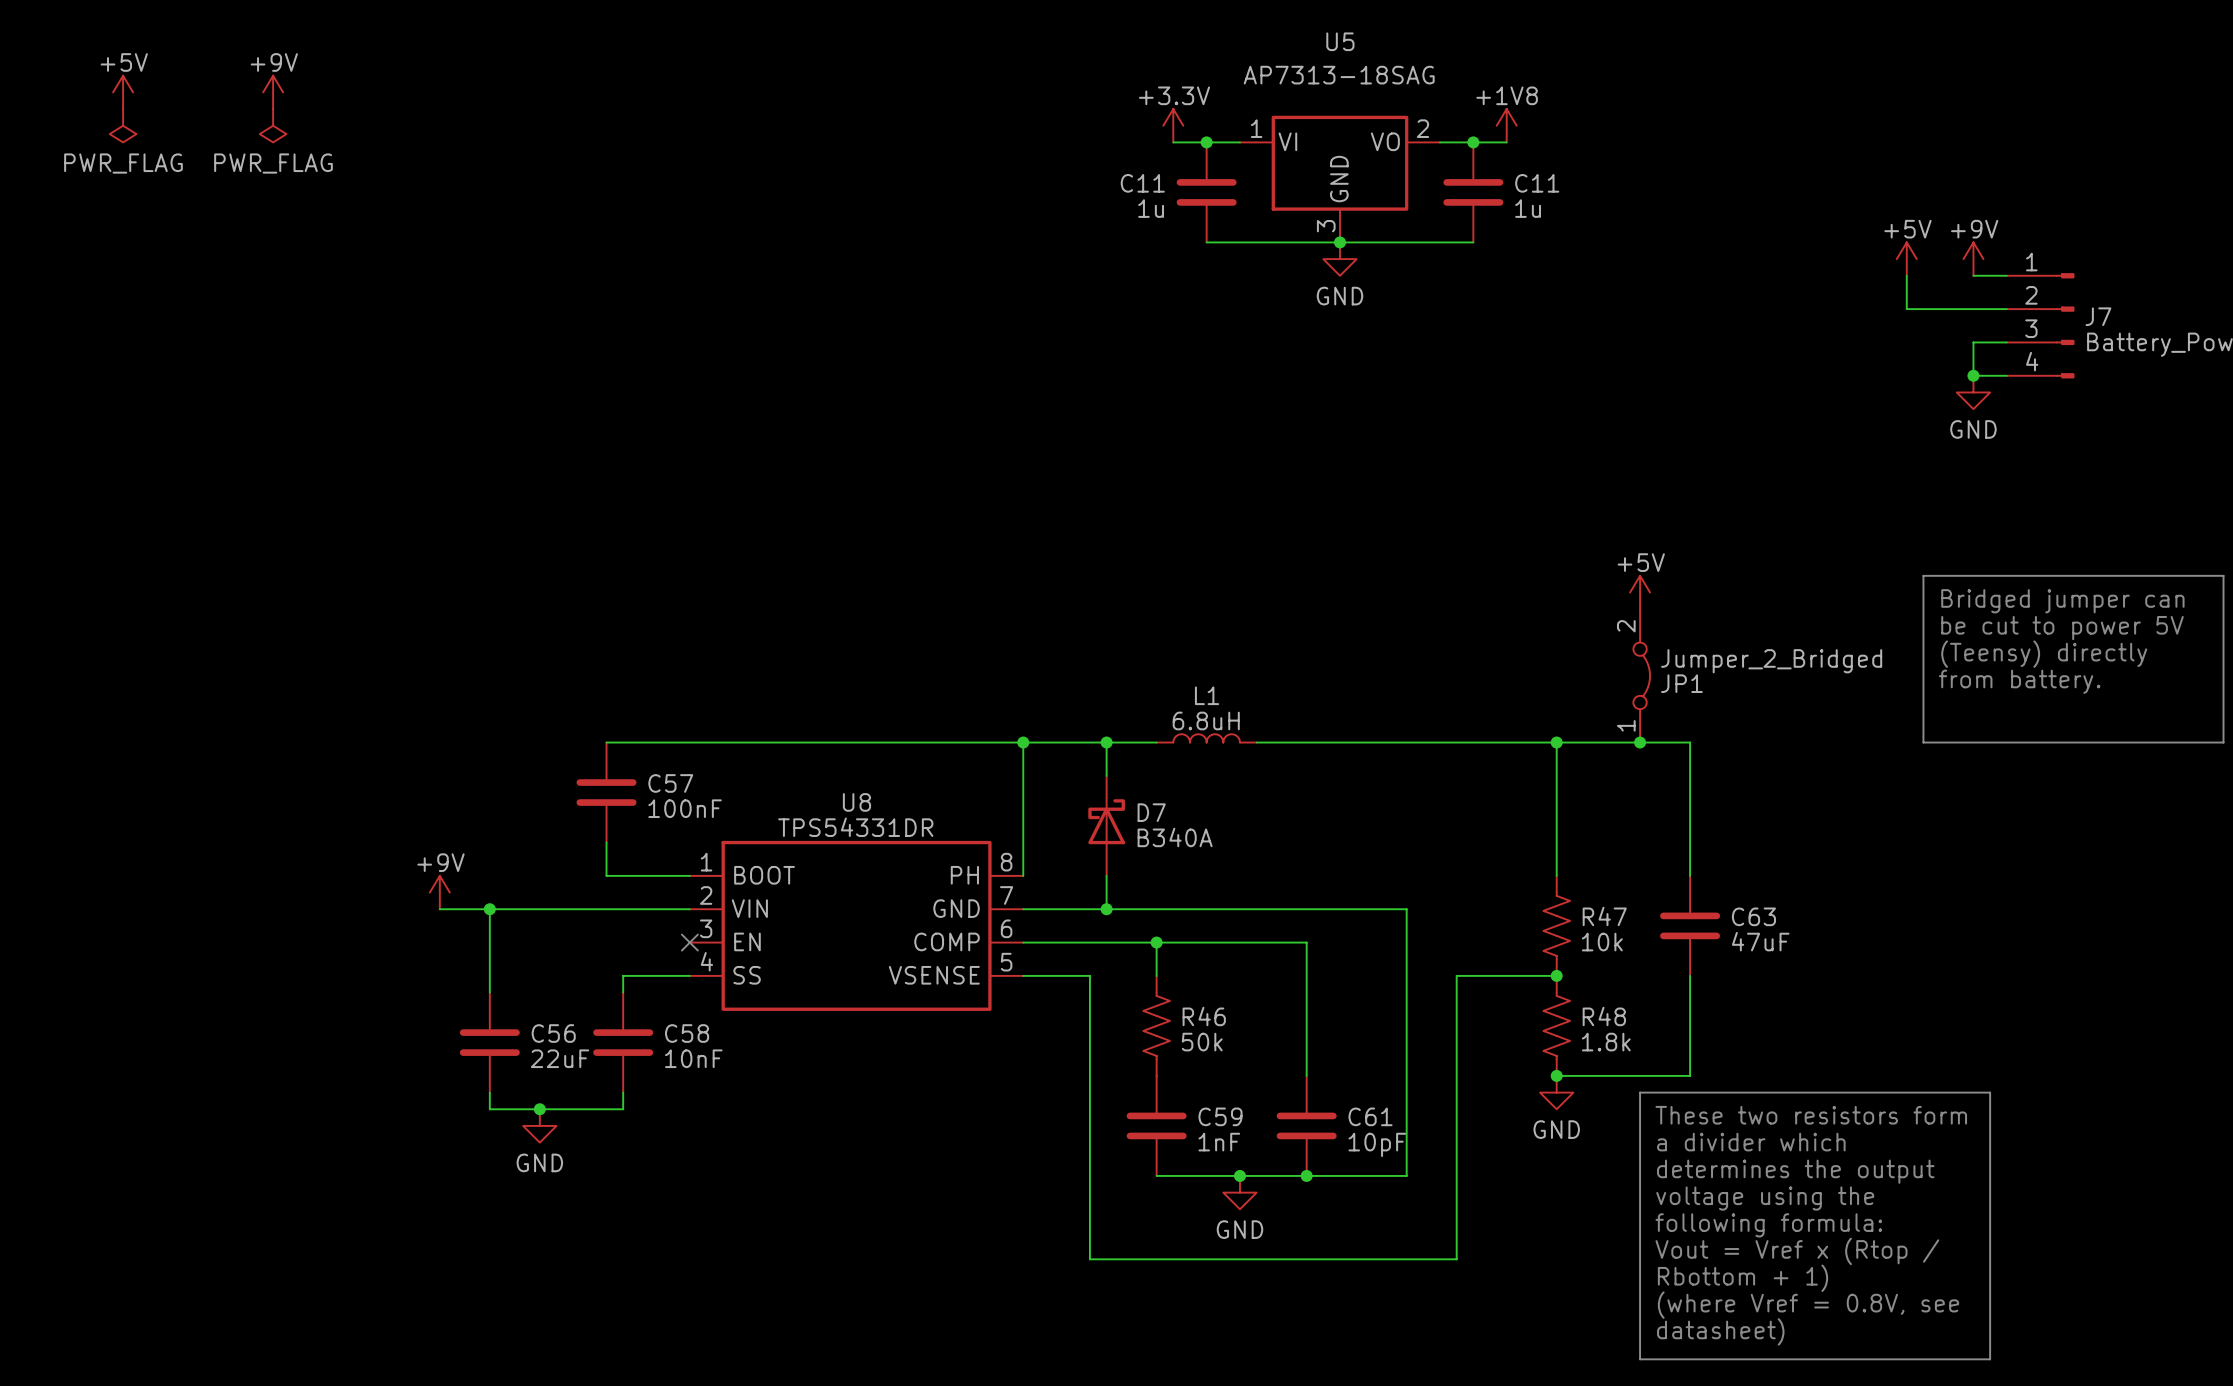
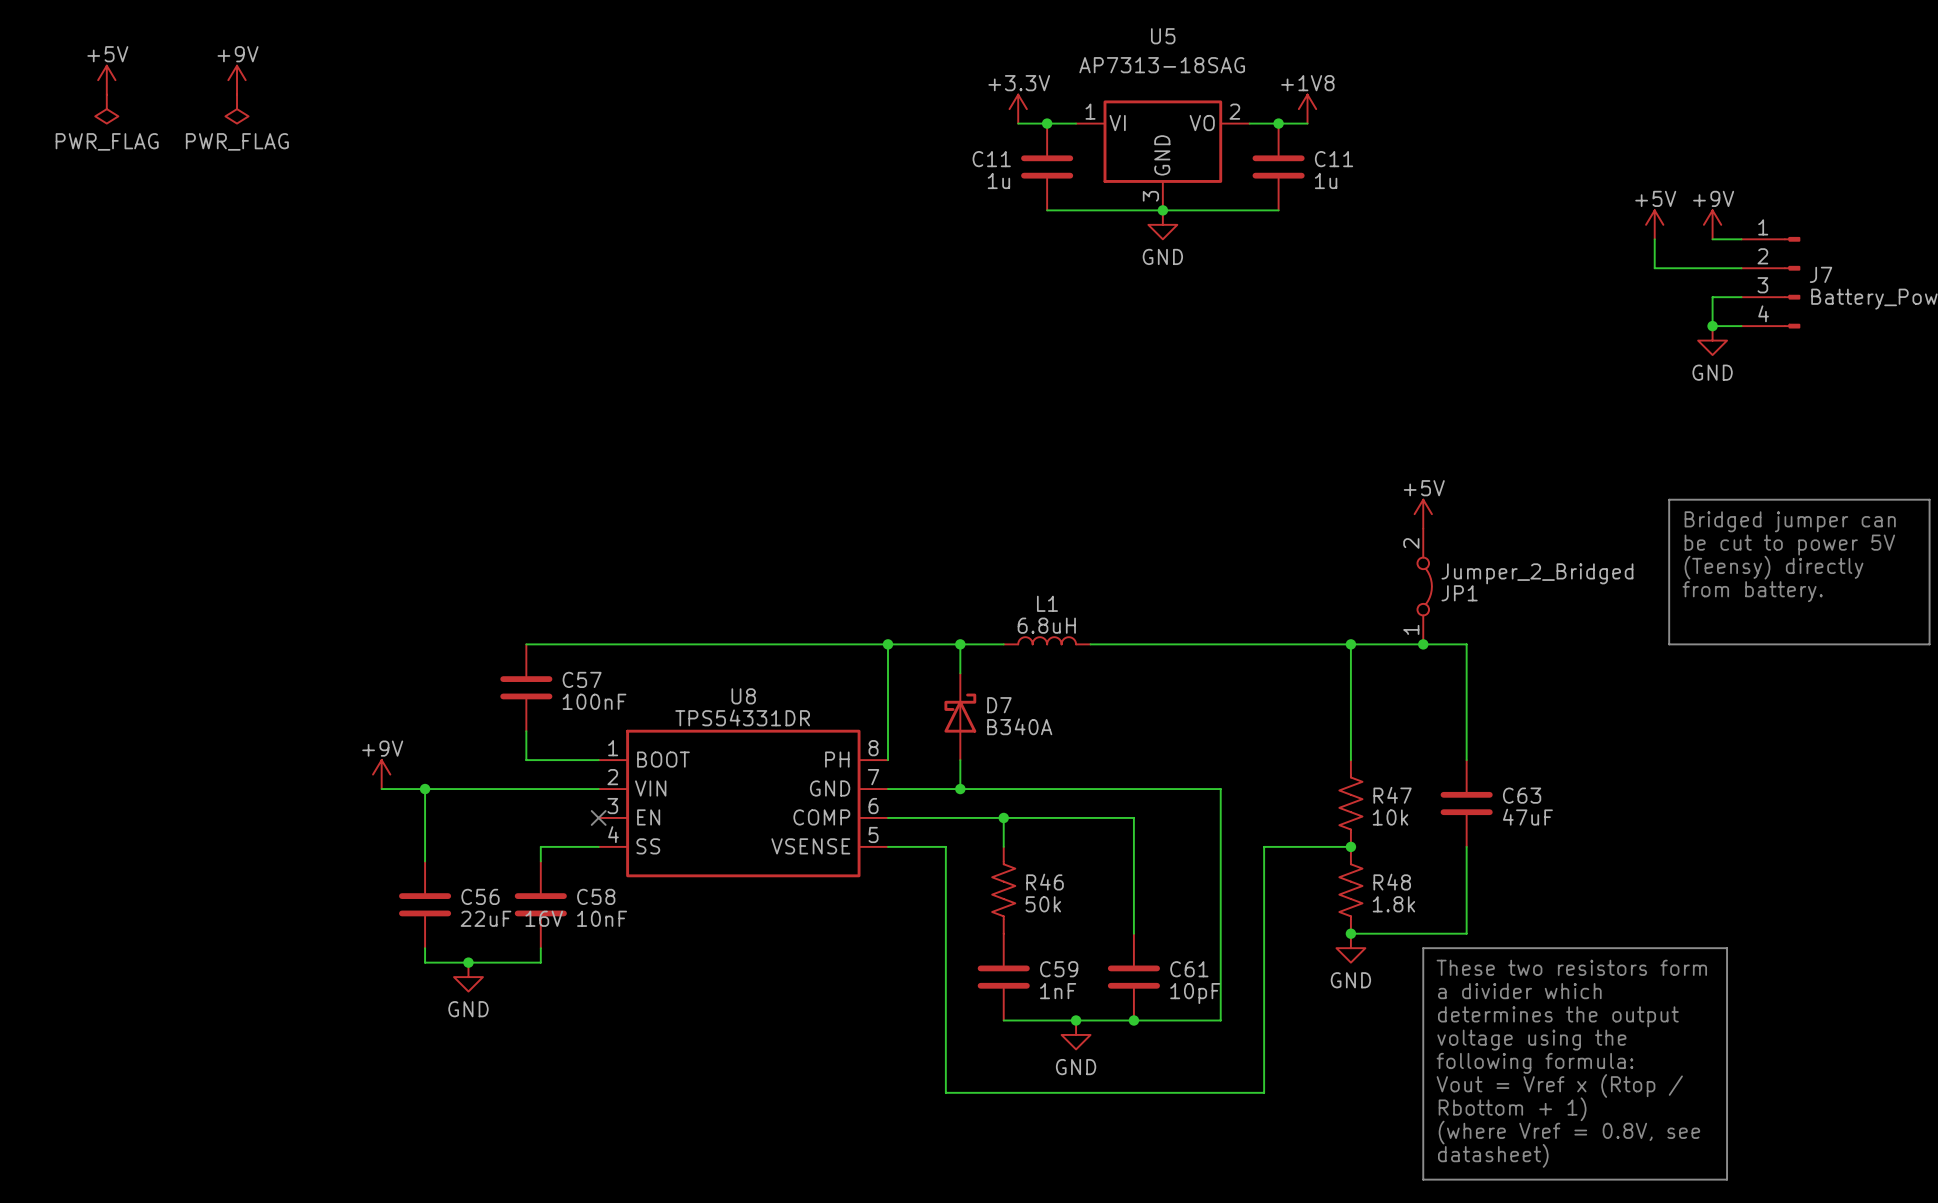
C56 value: 22uF (560, 1058) -> 22uF 16V (511, 918)

